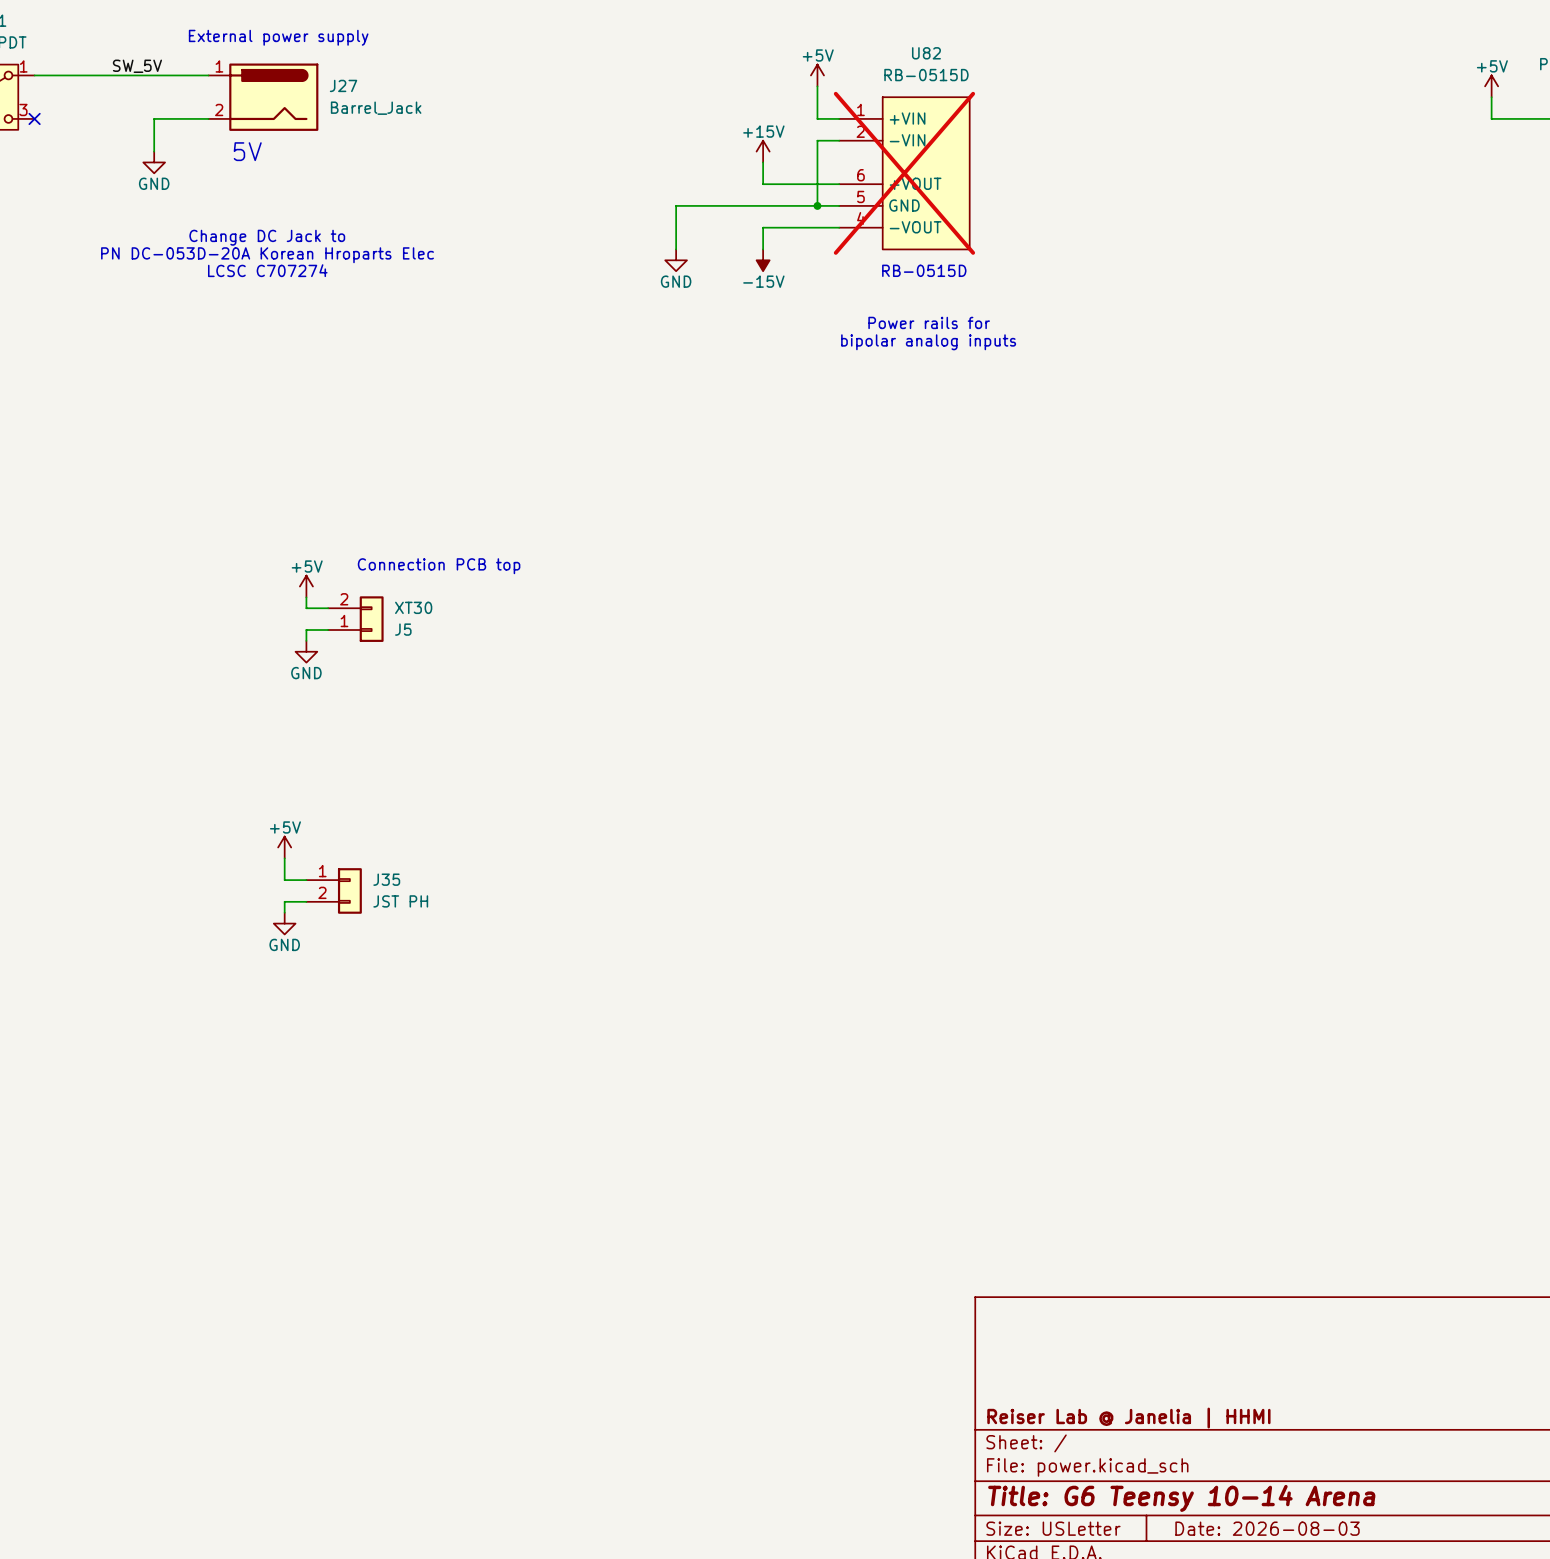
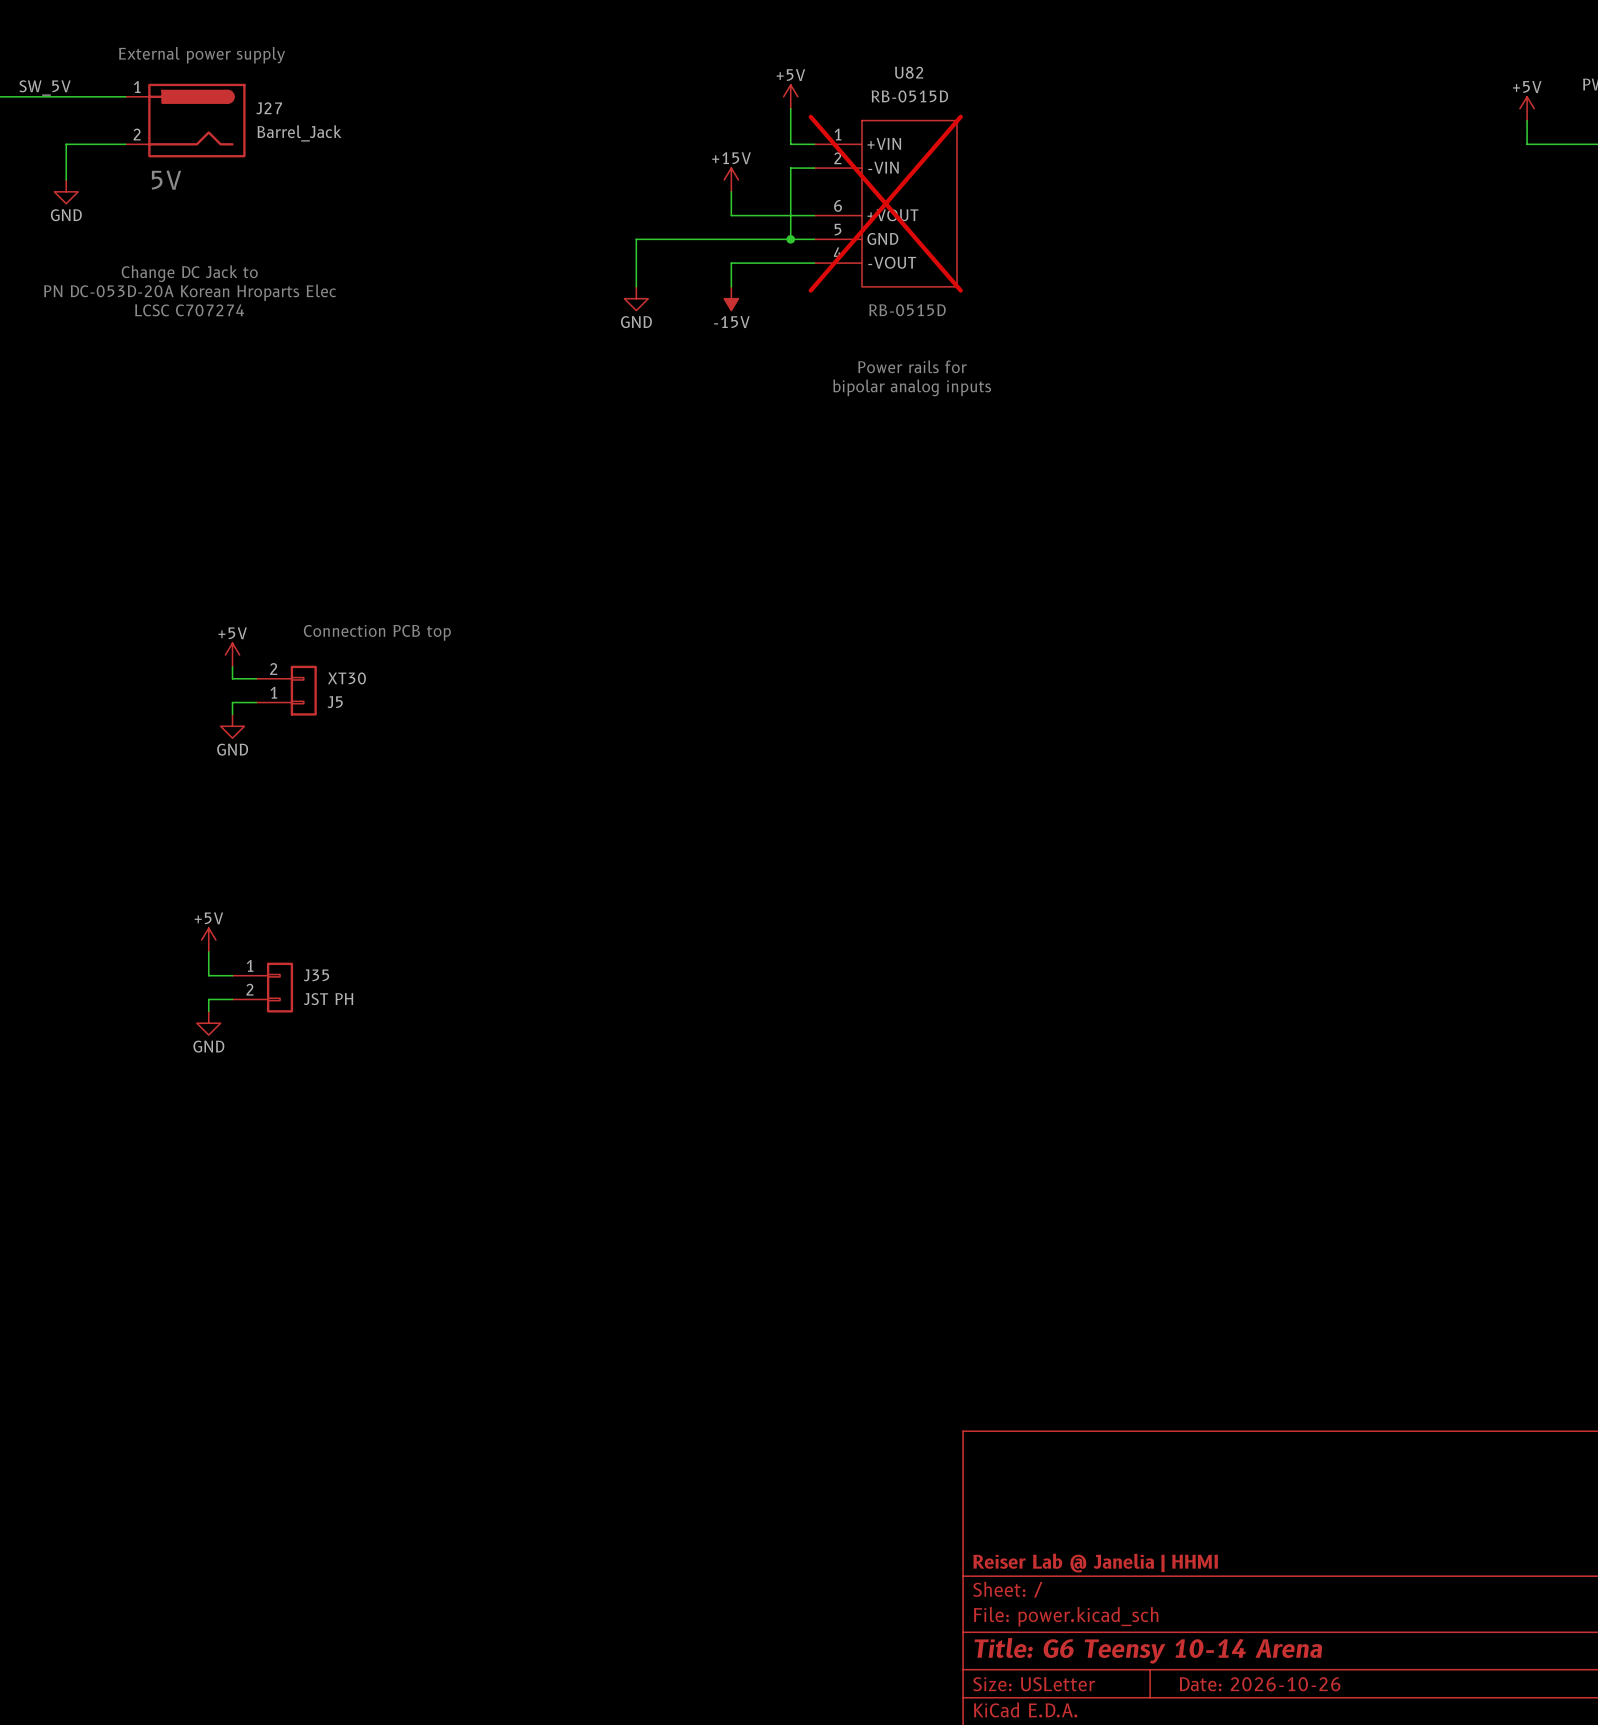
title block: Date: 2026-08-03 (1267, 1528) -> Date: 2026-10-26 (1260, 1684)

